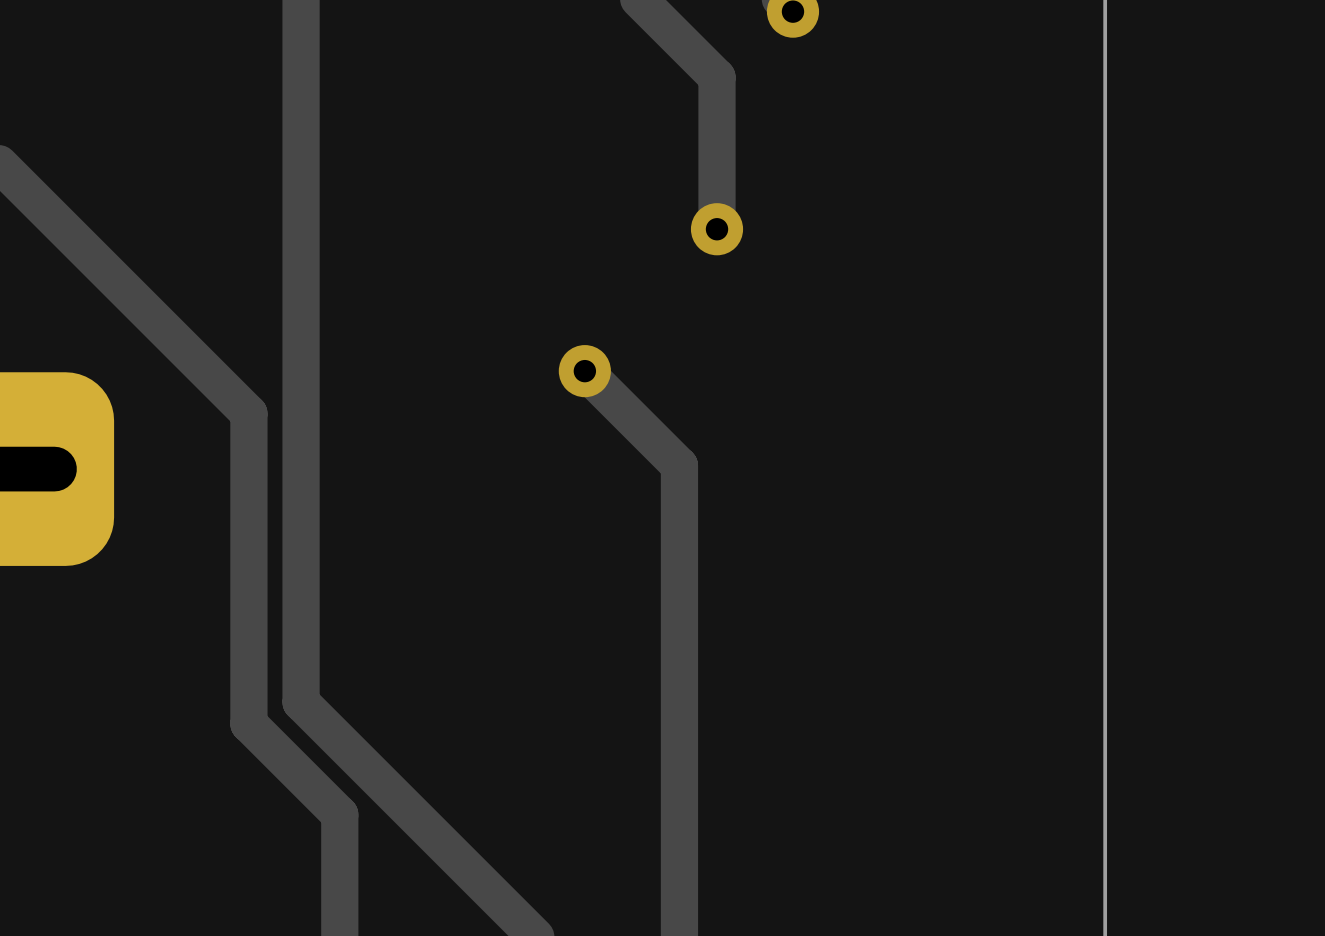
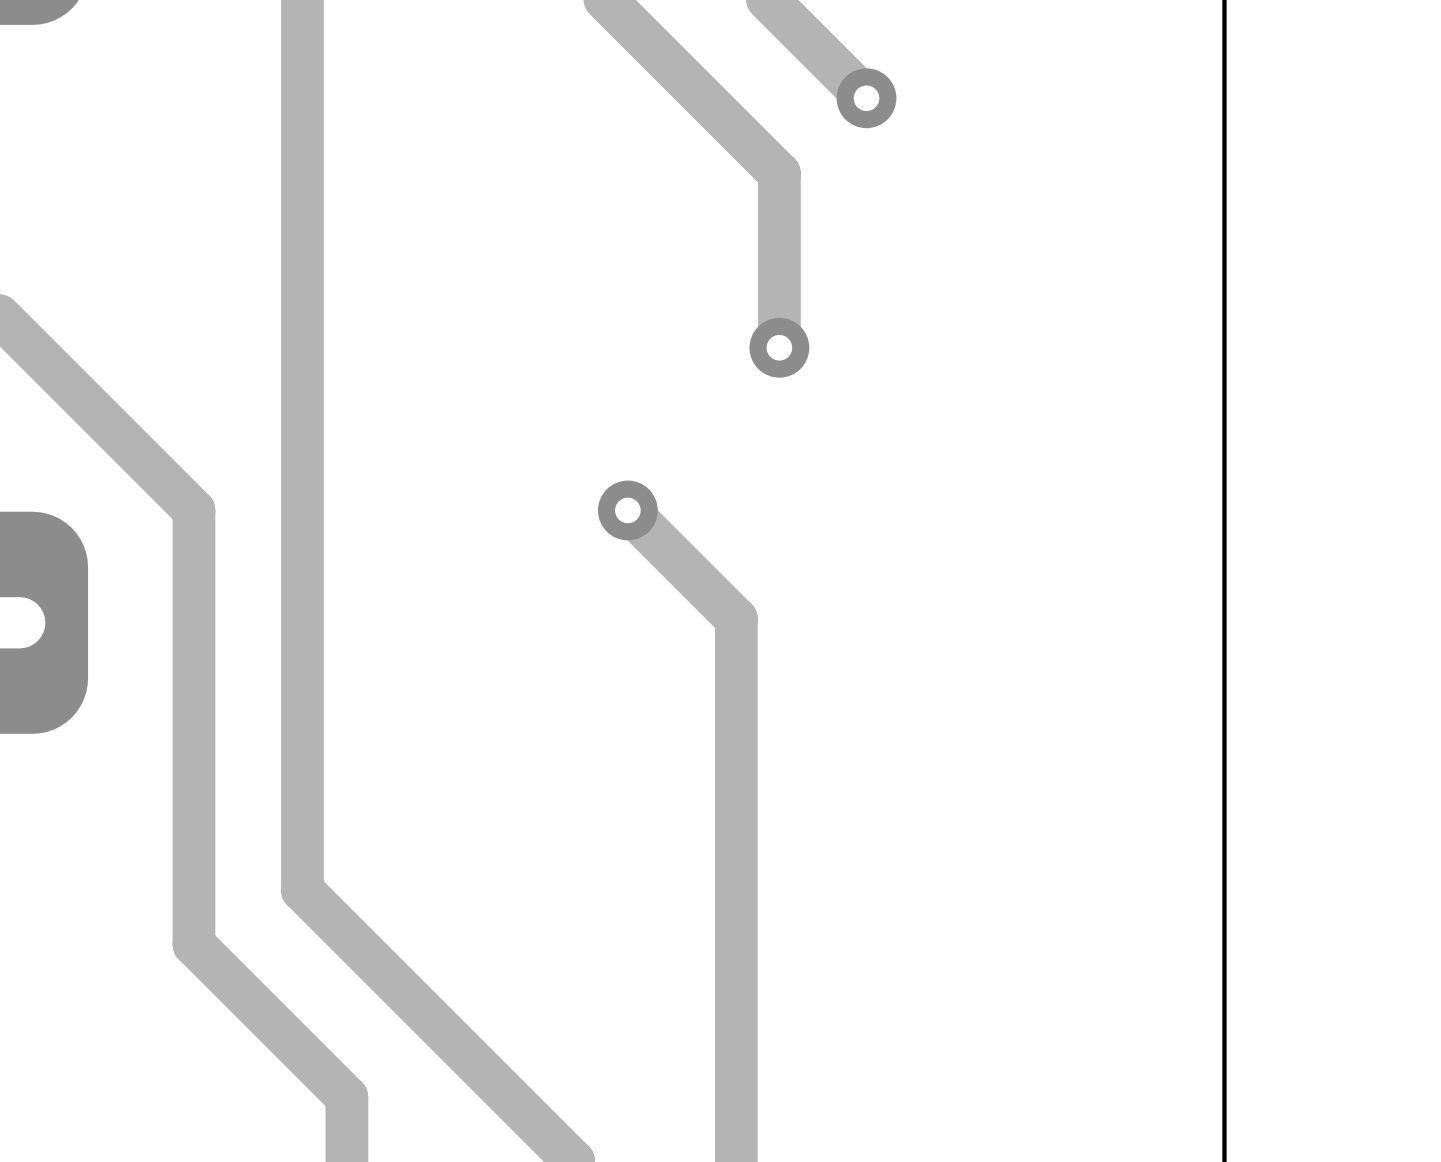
track: (206, 371) (248, 413) (248, 723) (339, 814) (339, 882) -> (193, 510) (193, 944) (346, 1097)

